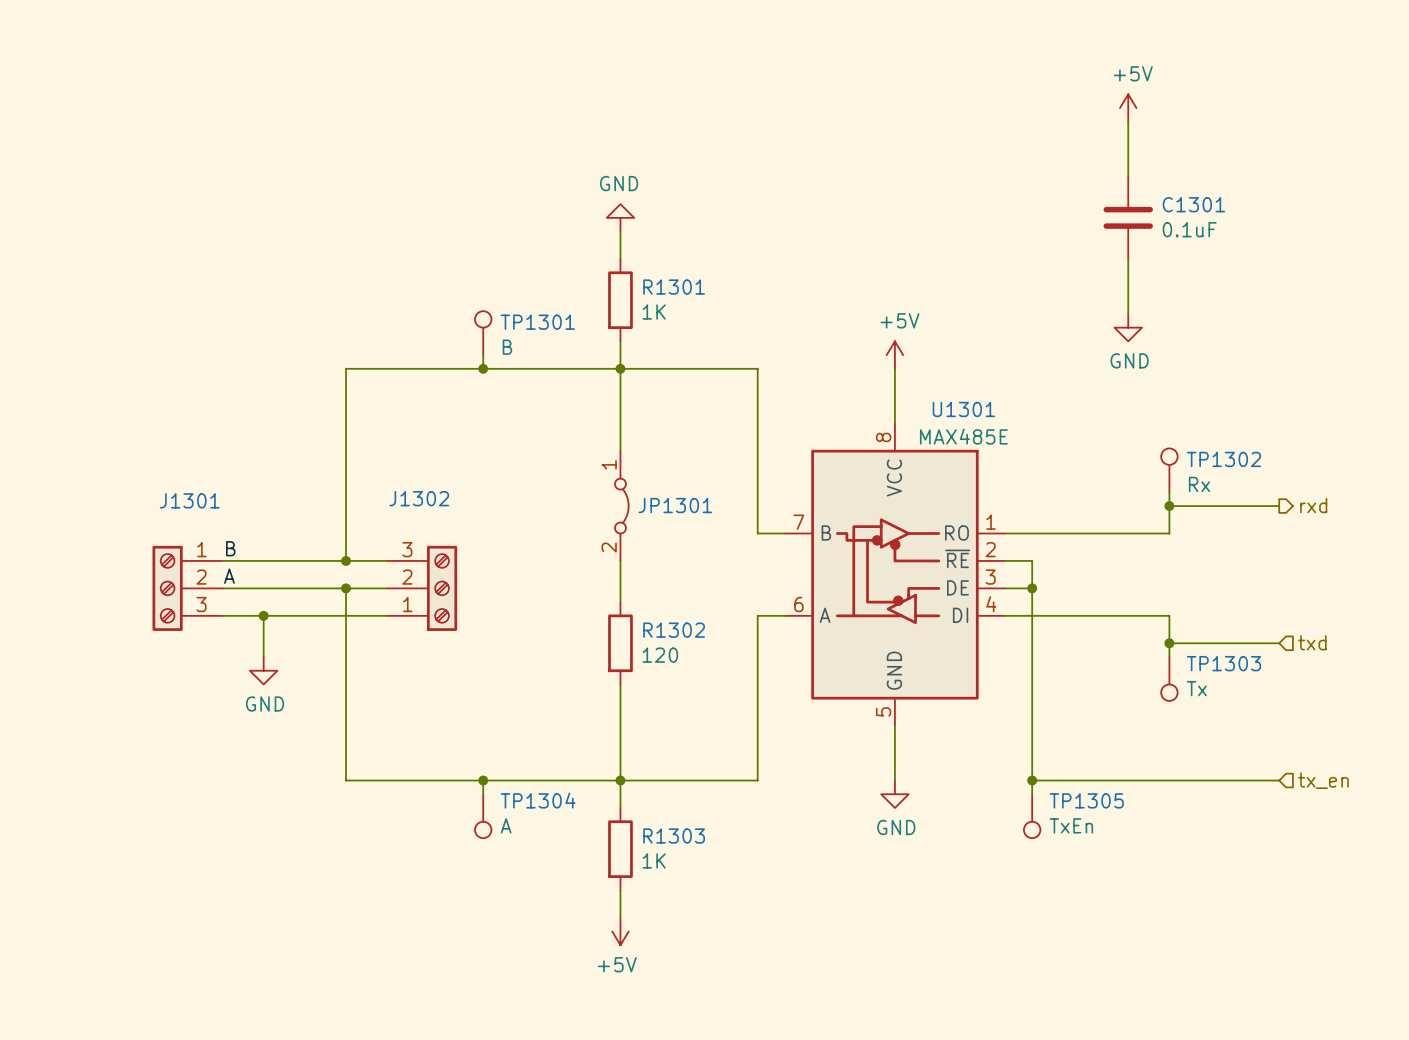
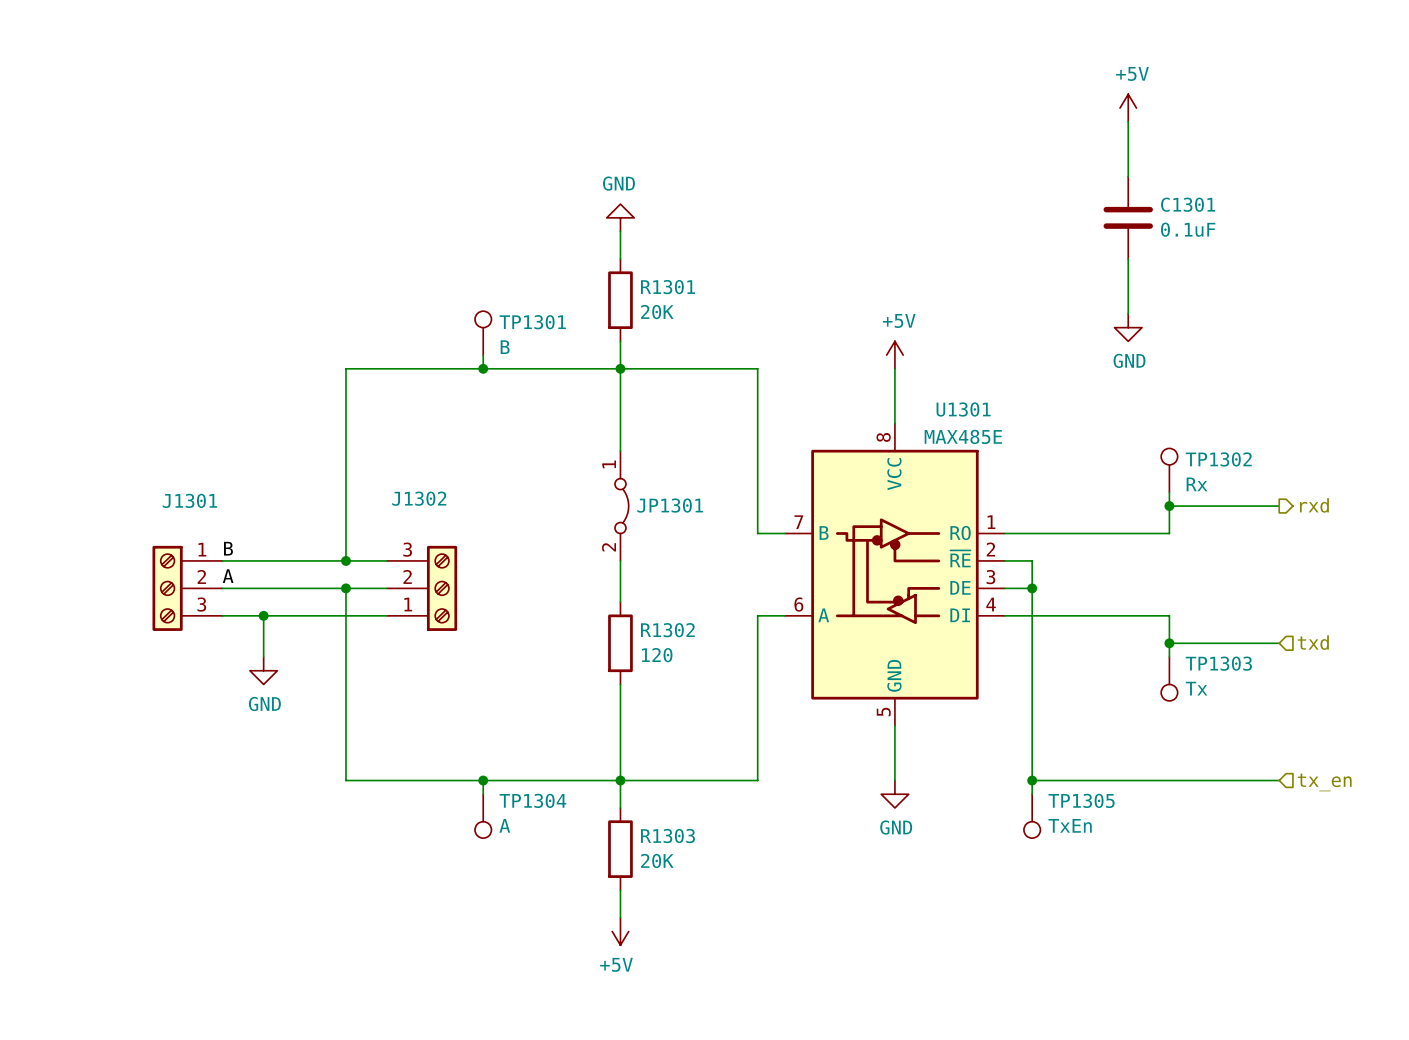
R1301 value: 1K (654, 312) -> 20K (657, 312)
R1303 value: 1K (654, 860) -> 20K (657, 860)

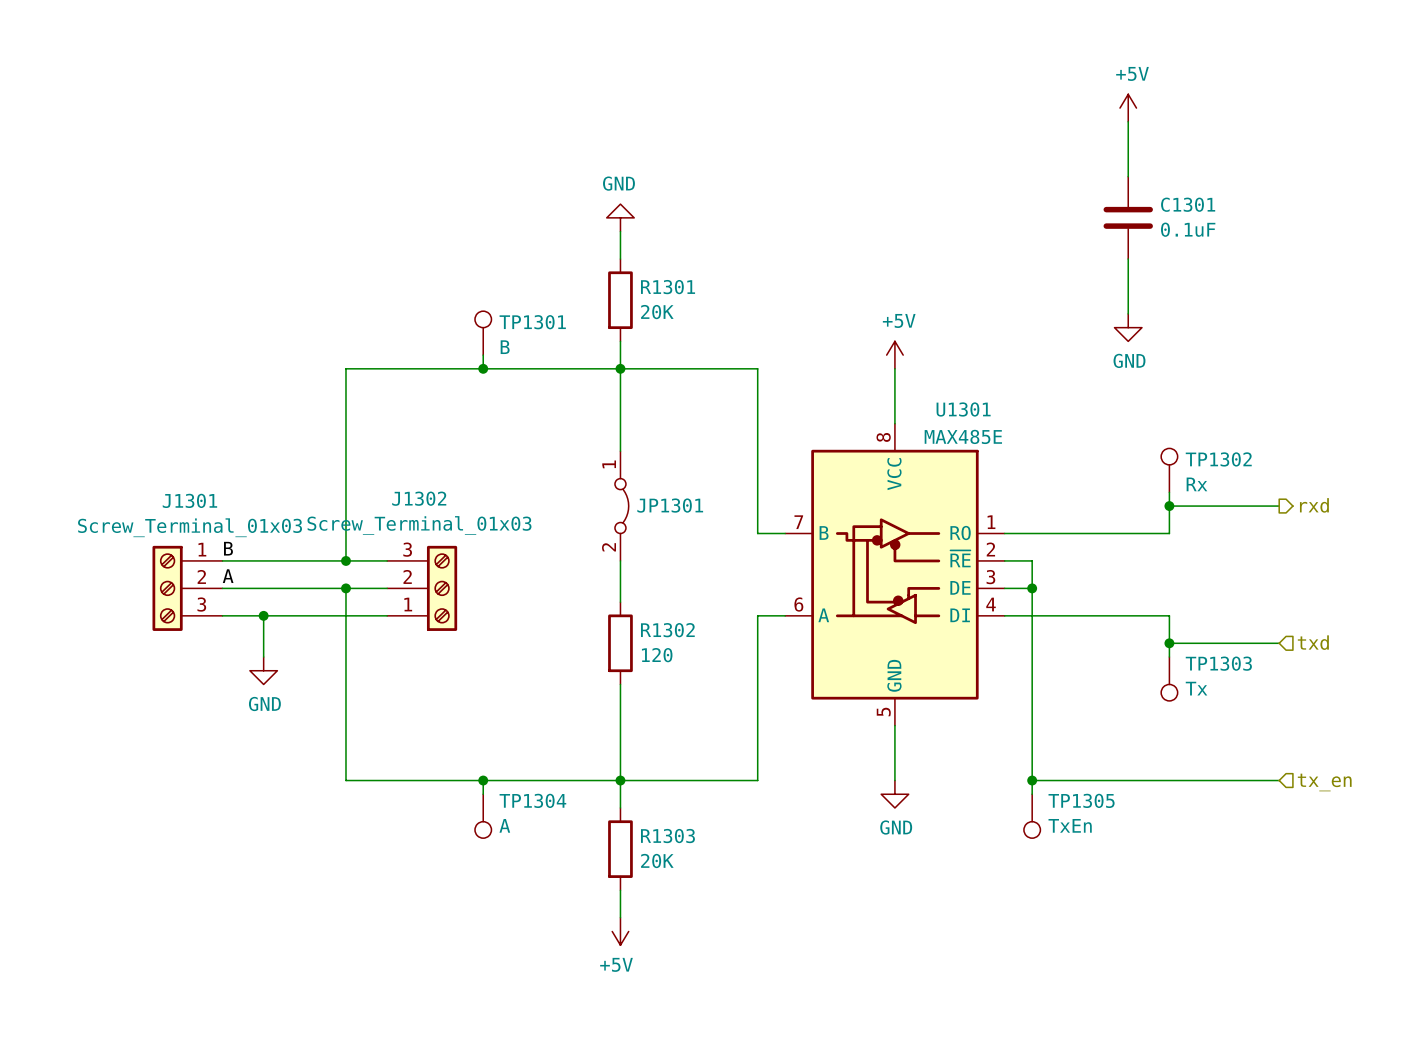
J1302 value: none -> Screw_Terminal_01x03 (419, 525)
J1301 value: none -> Screw_Terminal_01x03 (190, 527)

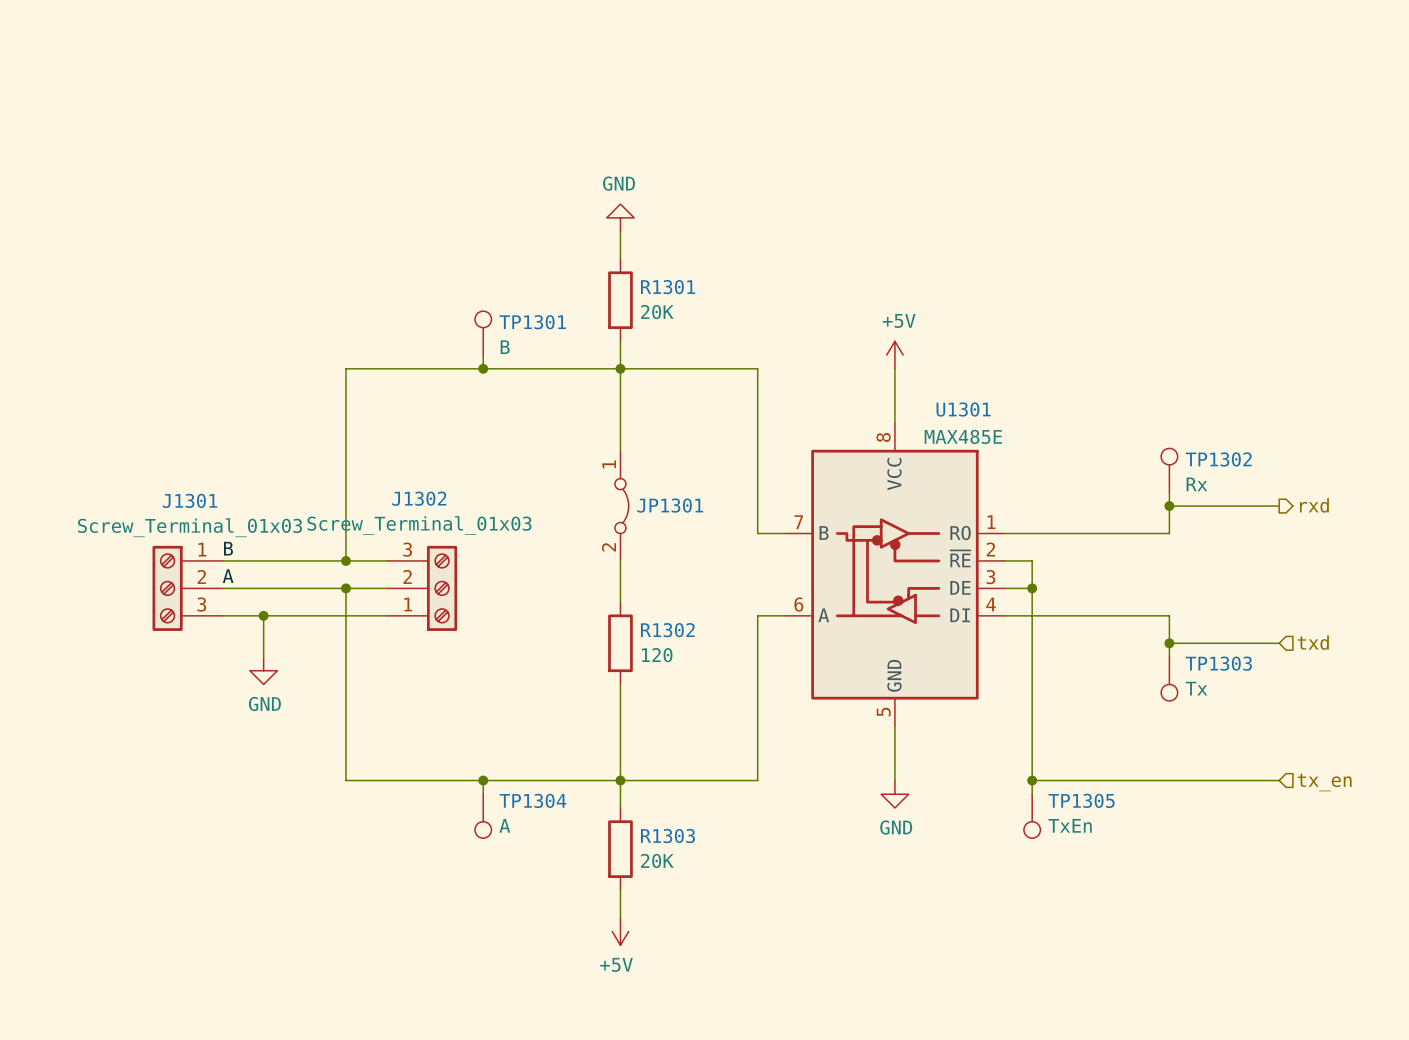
power symbol: +5V (1128, 108) -> none
wire: (1128, 121) (1128, 176) -> none
C1301: 0.1uF (1128, 217) -> none
wire: (1128, 259) (1128, 313) -> none
power symbol: GND (1128, 327) -> none

